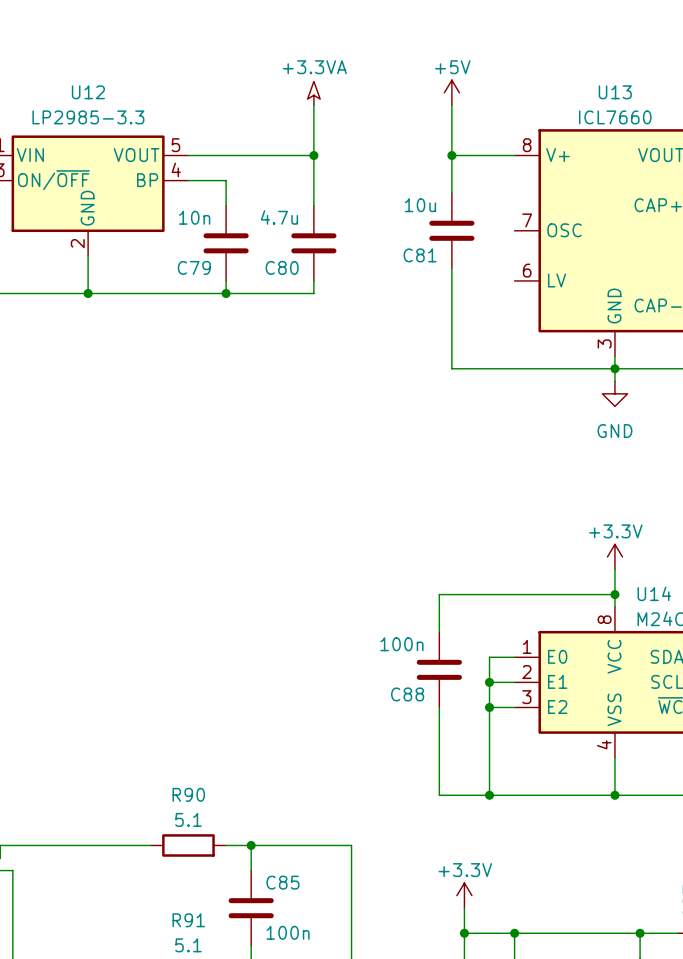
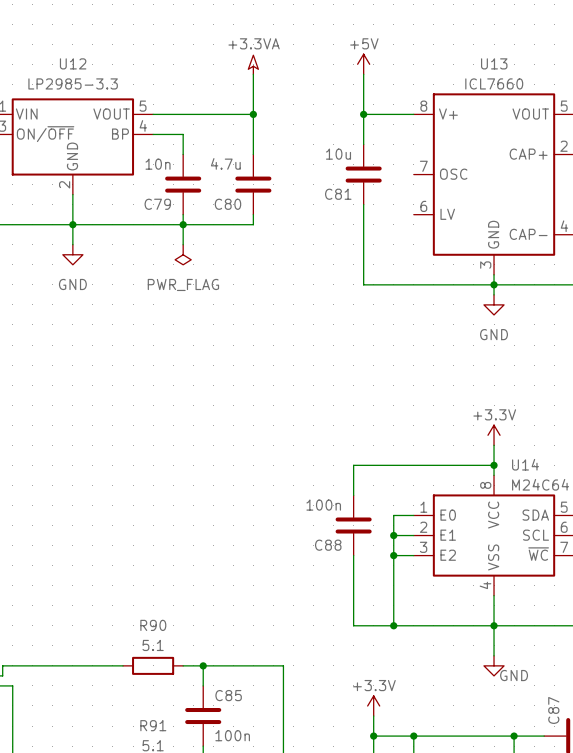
wire: none -> (72, 224) (72, 244)
wire: none -> (183, 224) (183, 244)
power symbol: none -> GND (72, 254)
power symbol: none -> PWR_FLAG (183, 254)
wire: none -> (494, 625) (494, 655)
power symbol: none -> GND (494, 665)

